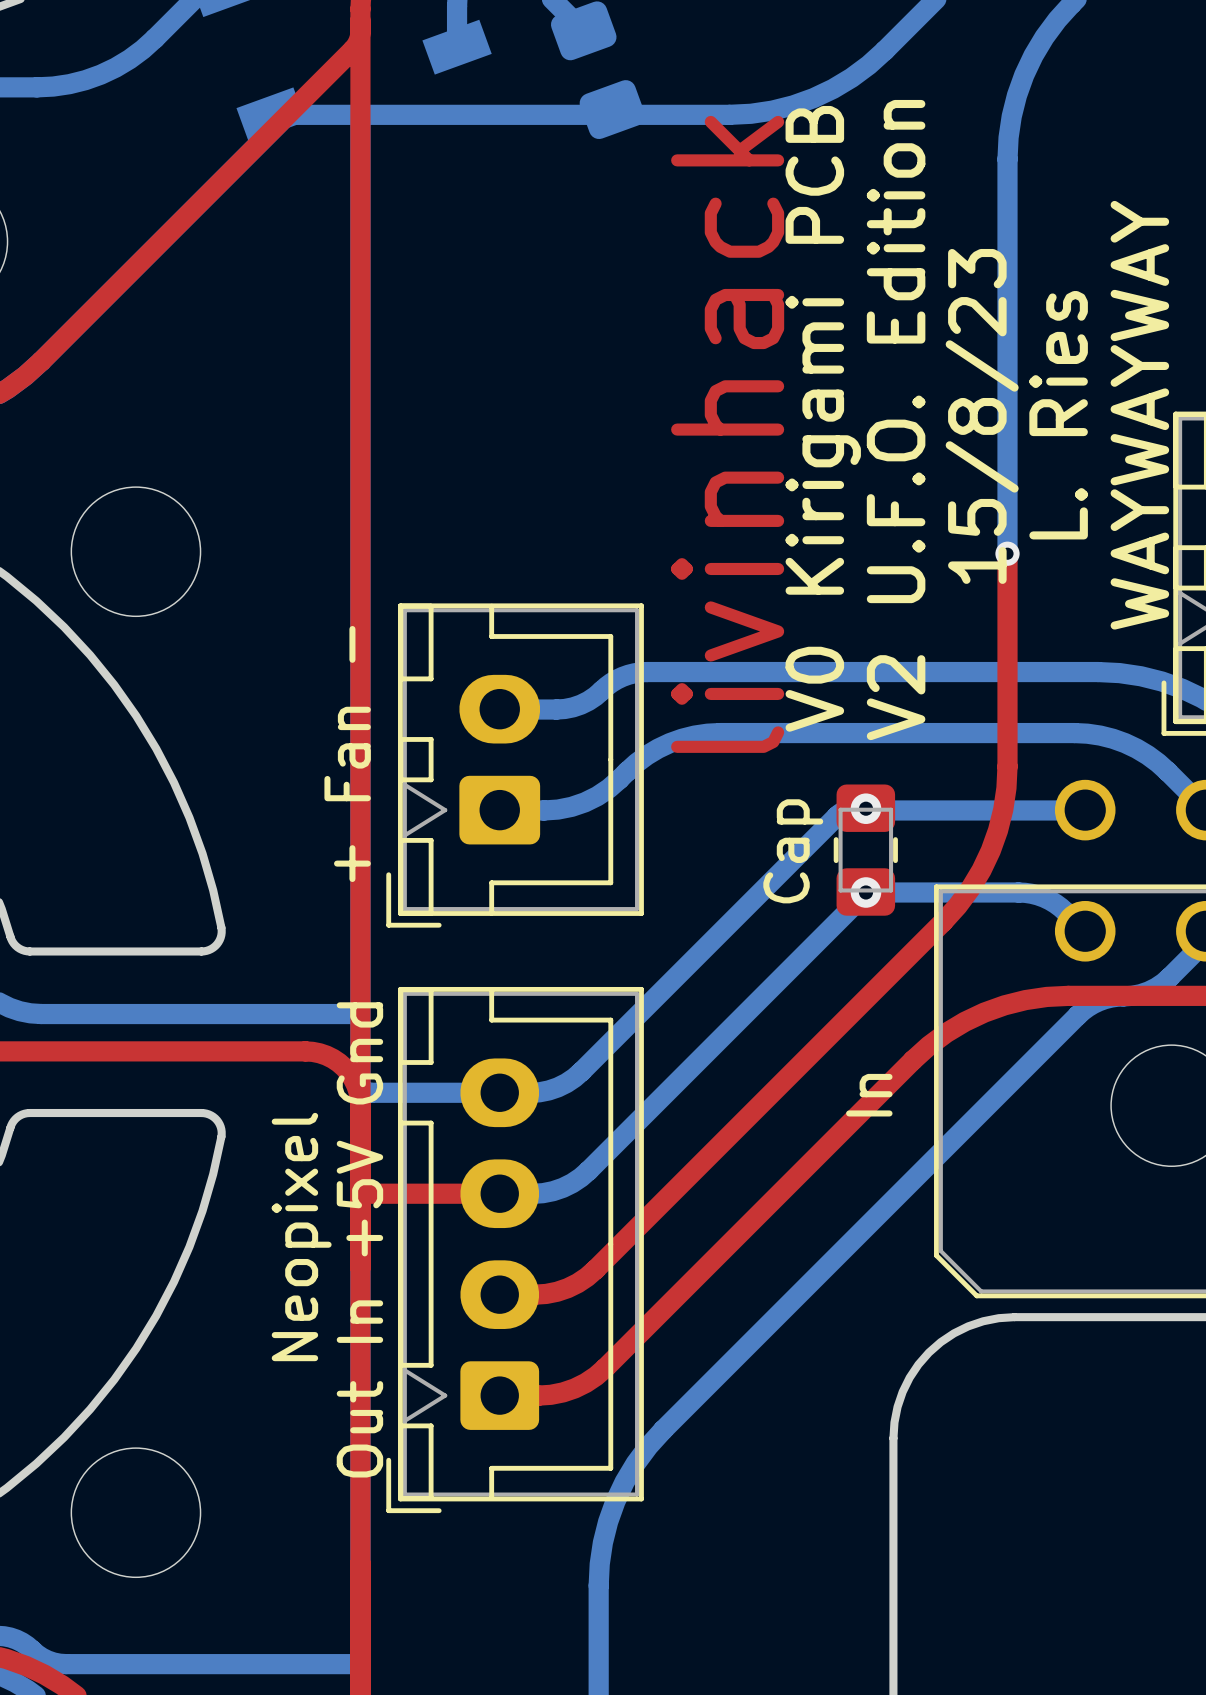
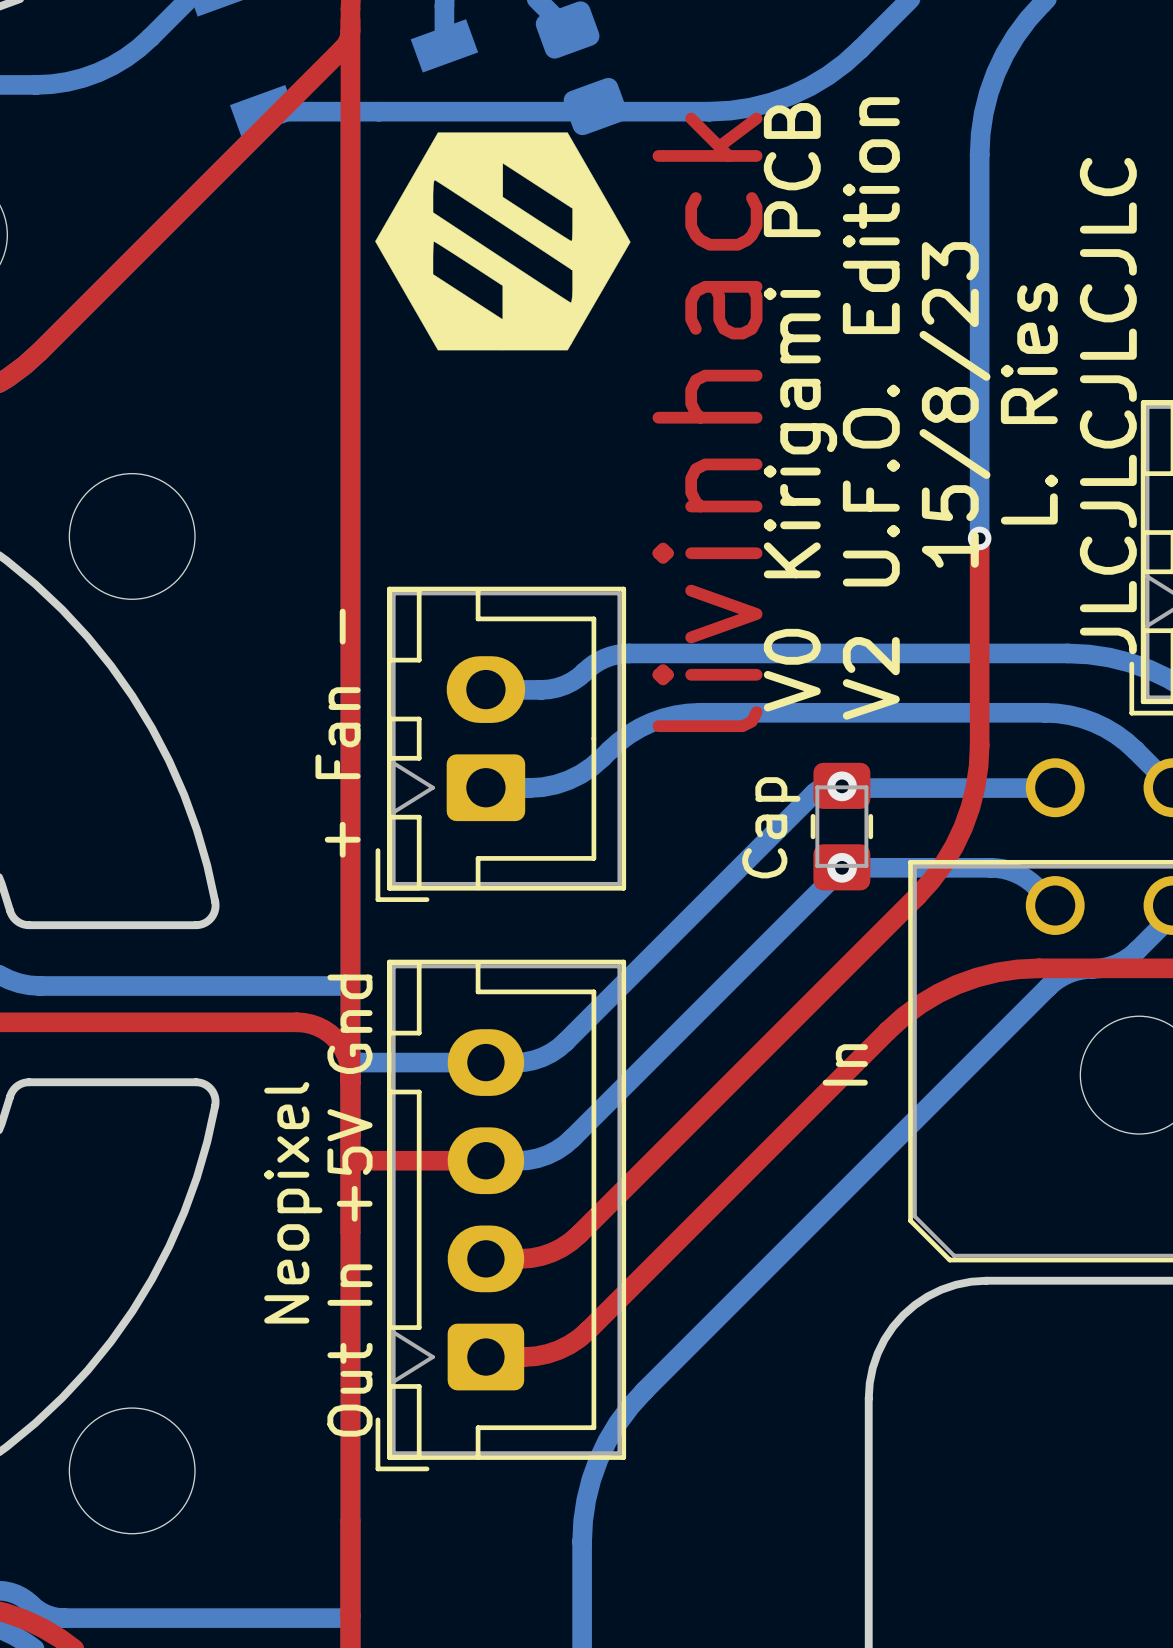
drawing: none -> [375, 132, 631, 351]
text: WAYWAYWAY (1139, 415) -> JLCJLCJLCJLC (1108, 406)

